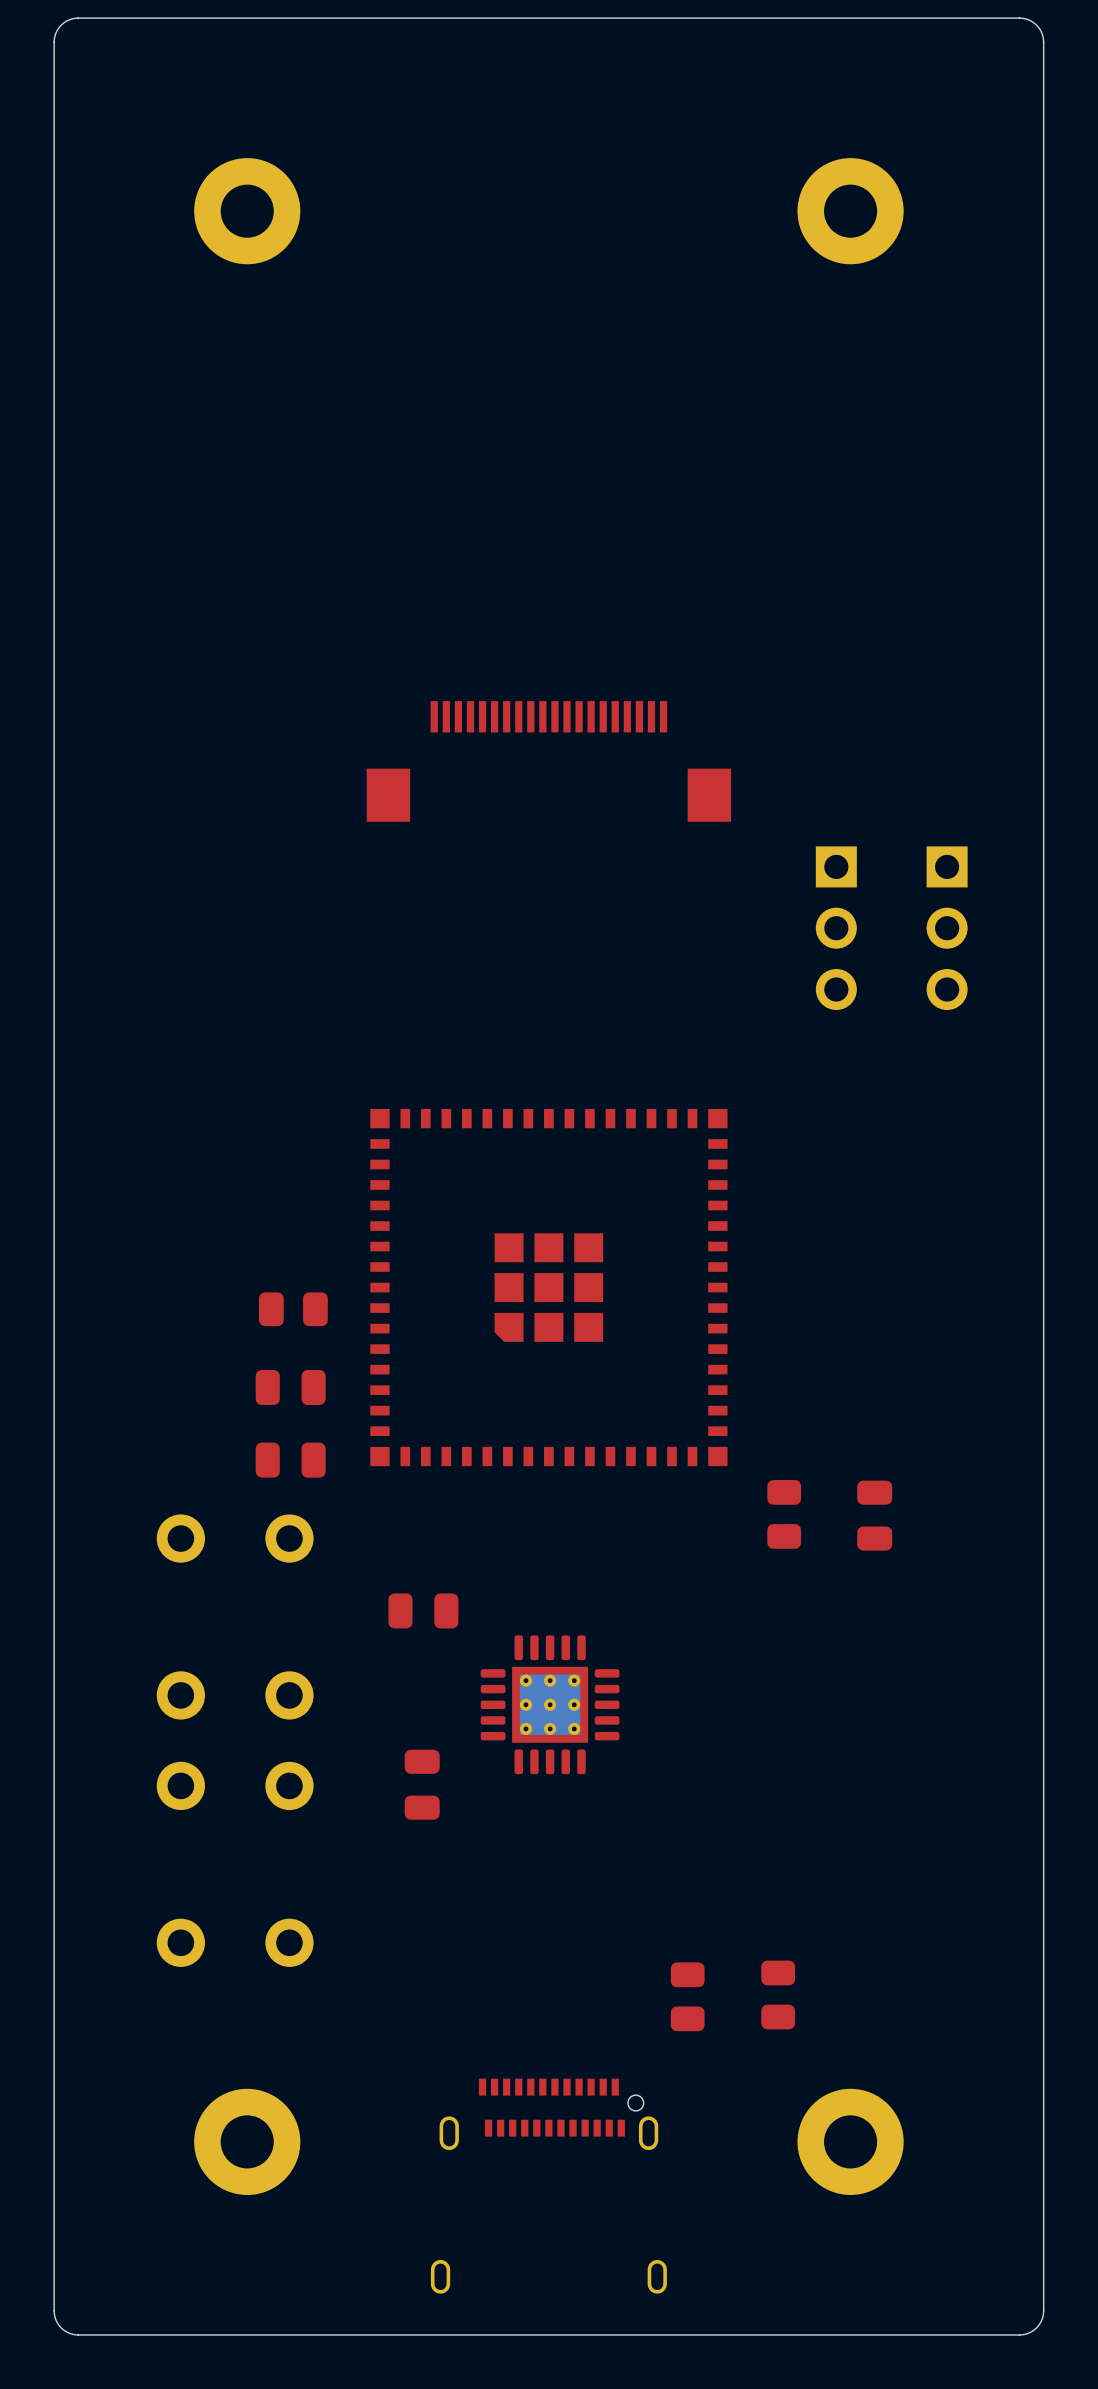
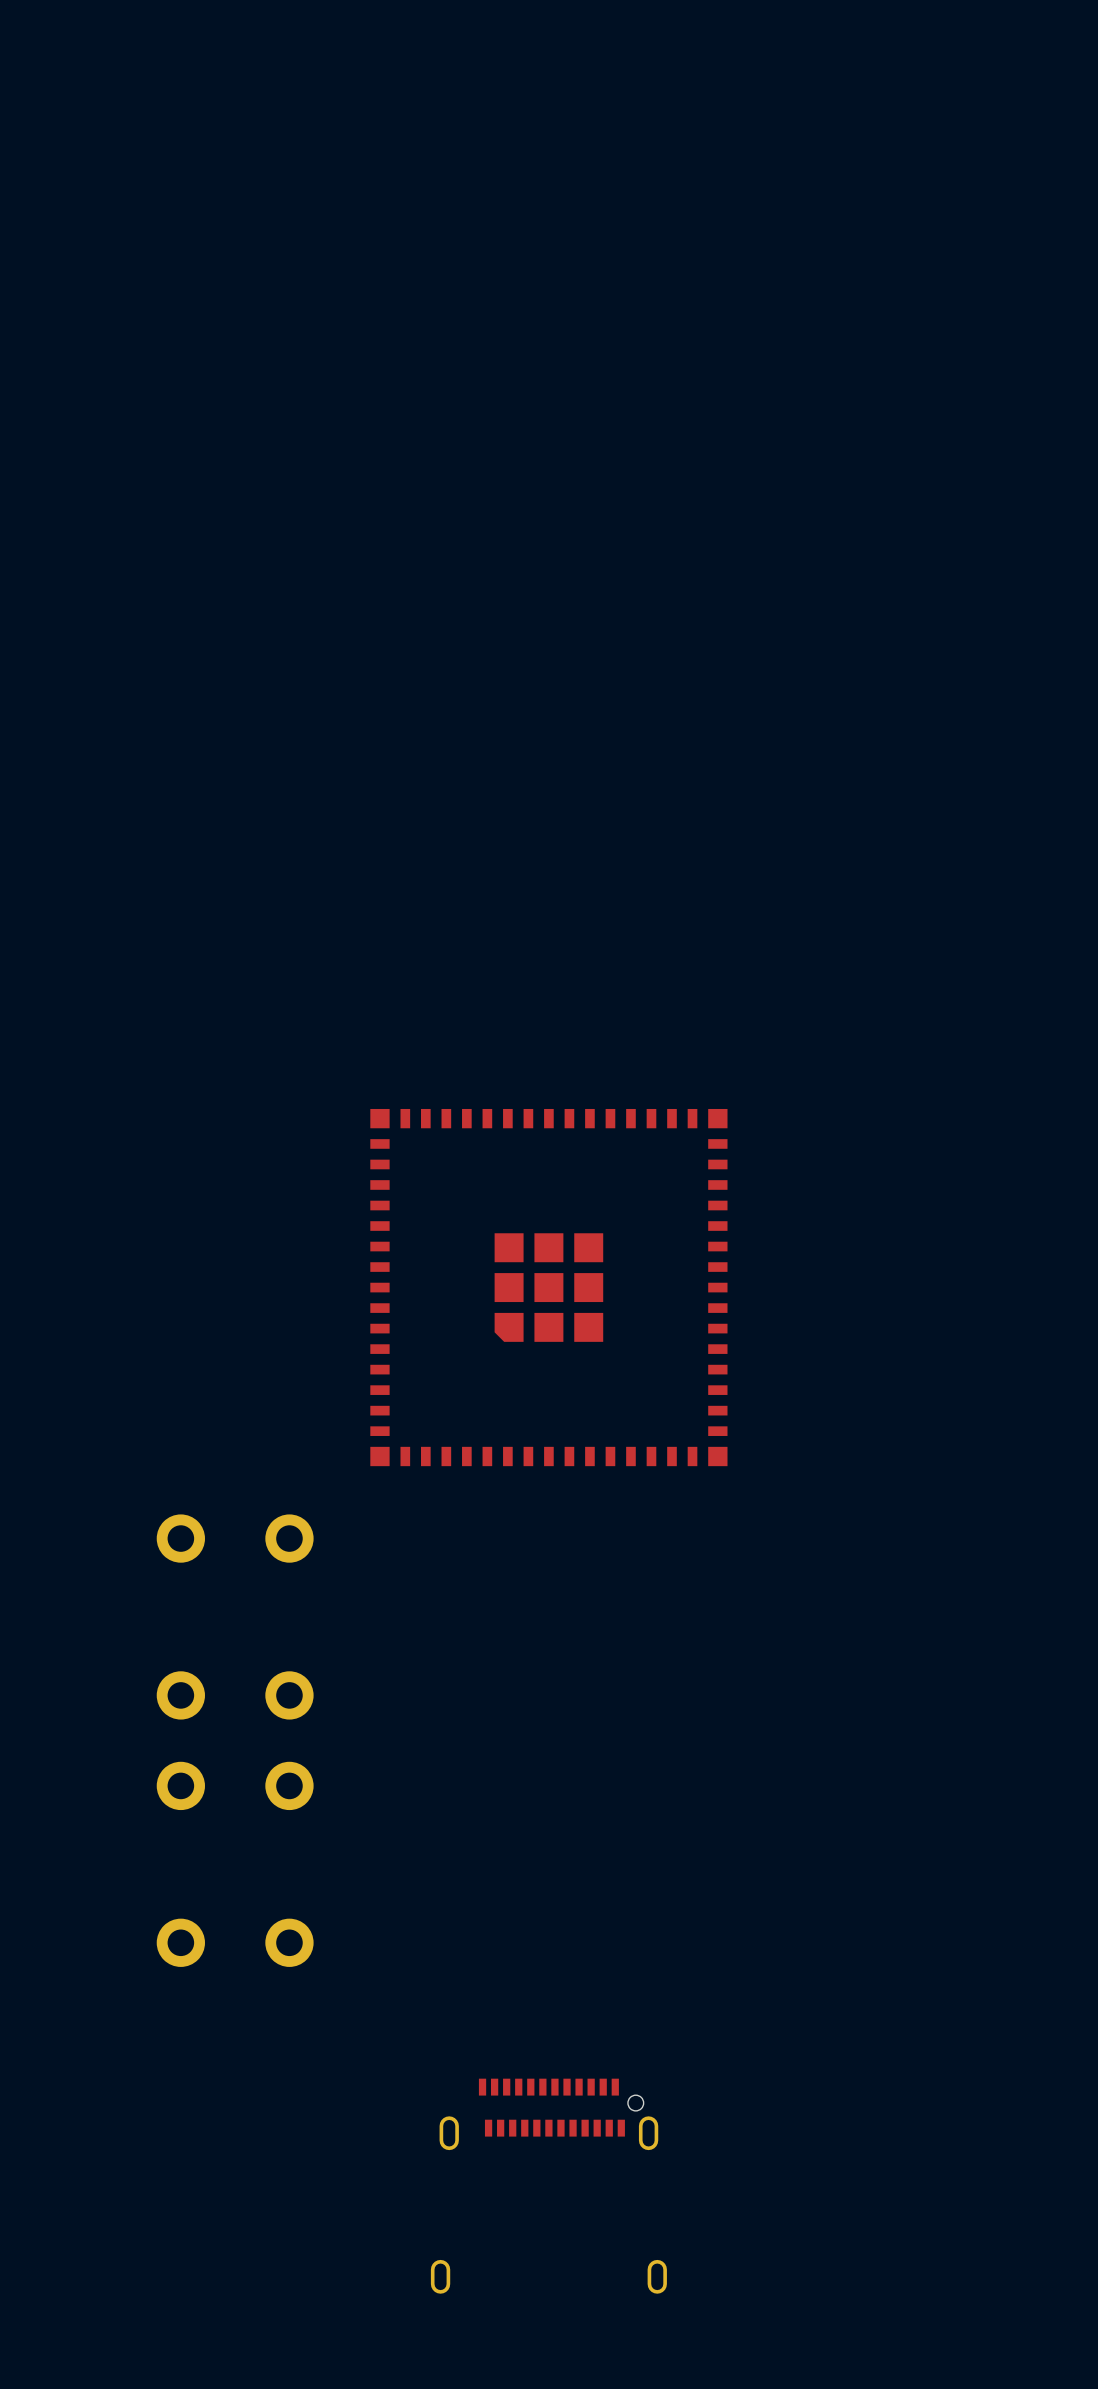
board edge: (1019, 18) (78, 18) (63, 23) (55, 34) (54, 2310) (59, 2325) (70, 2333) (1019, 2334) (1034, 2329) (1042, 2318) (1043, 42) (1041, 31) (1036, 25) (1029, 20) (1019, 18) -> none
part: (247, 211) -> none
part: (850, 211) -> none
part: (548, 761) -> none
part: (836, 928) -> none
part: (947, 928) -> none
part: (293, 1309) -> none
part: (290, 1387) -> none
part: (290, 1460) -> none
part: (784, 1514) -> none
part: (874, 1515) -> none
part: (423, 1610) -> none
part: (550, 1704) -> none
part: (422, 1784) -> none
part: (778, 1994) -> none
part: (687, 1996) -> none
part: (247, 2141) -> none
part: (850, 2141) -> none

